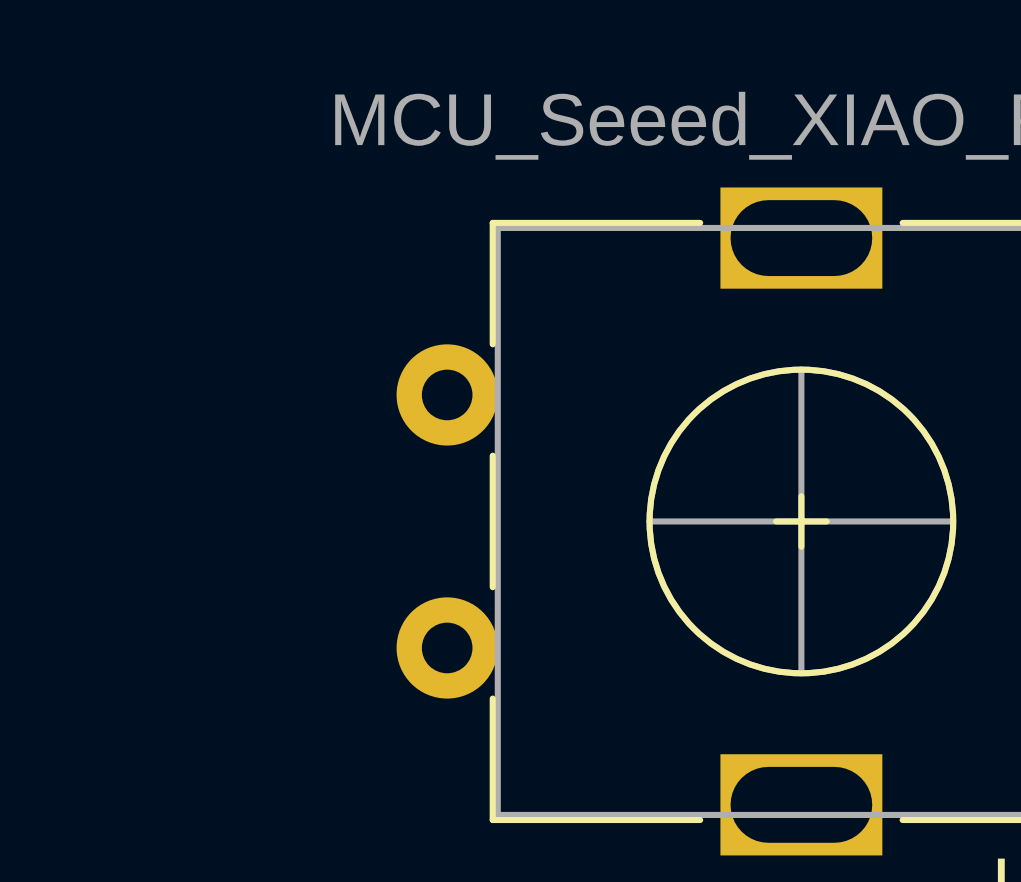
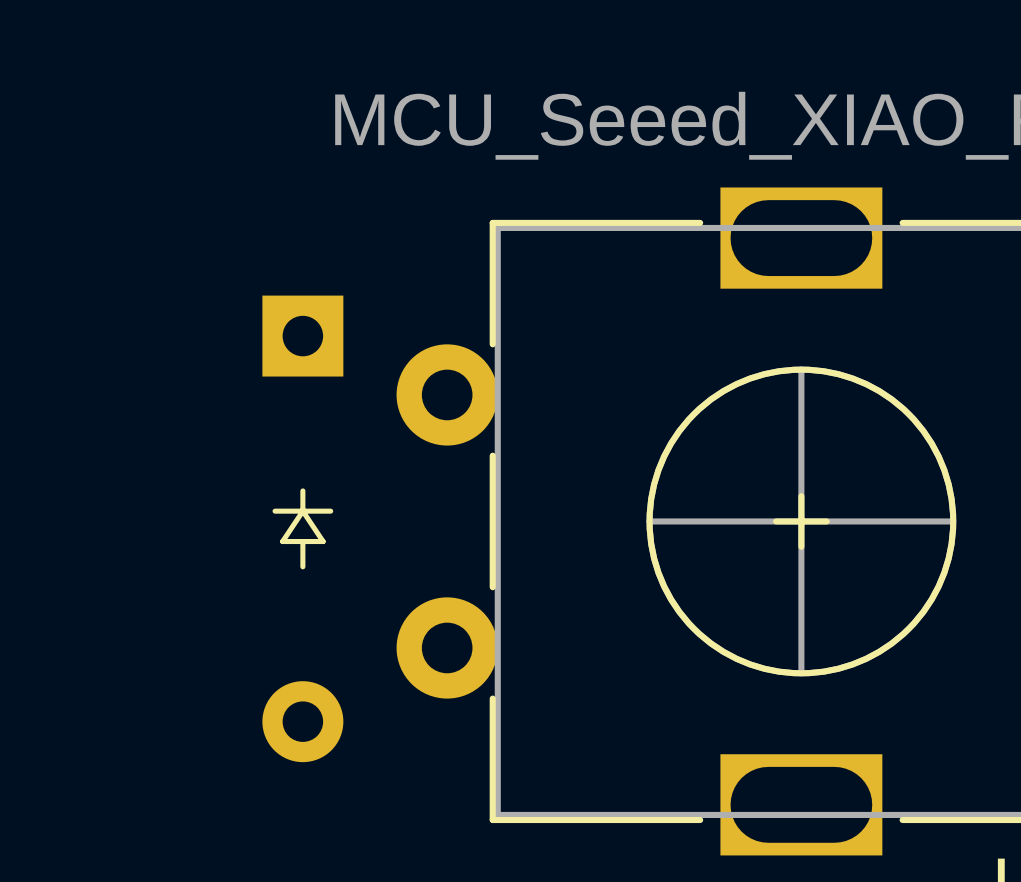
part: none -> (302, 528)

